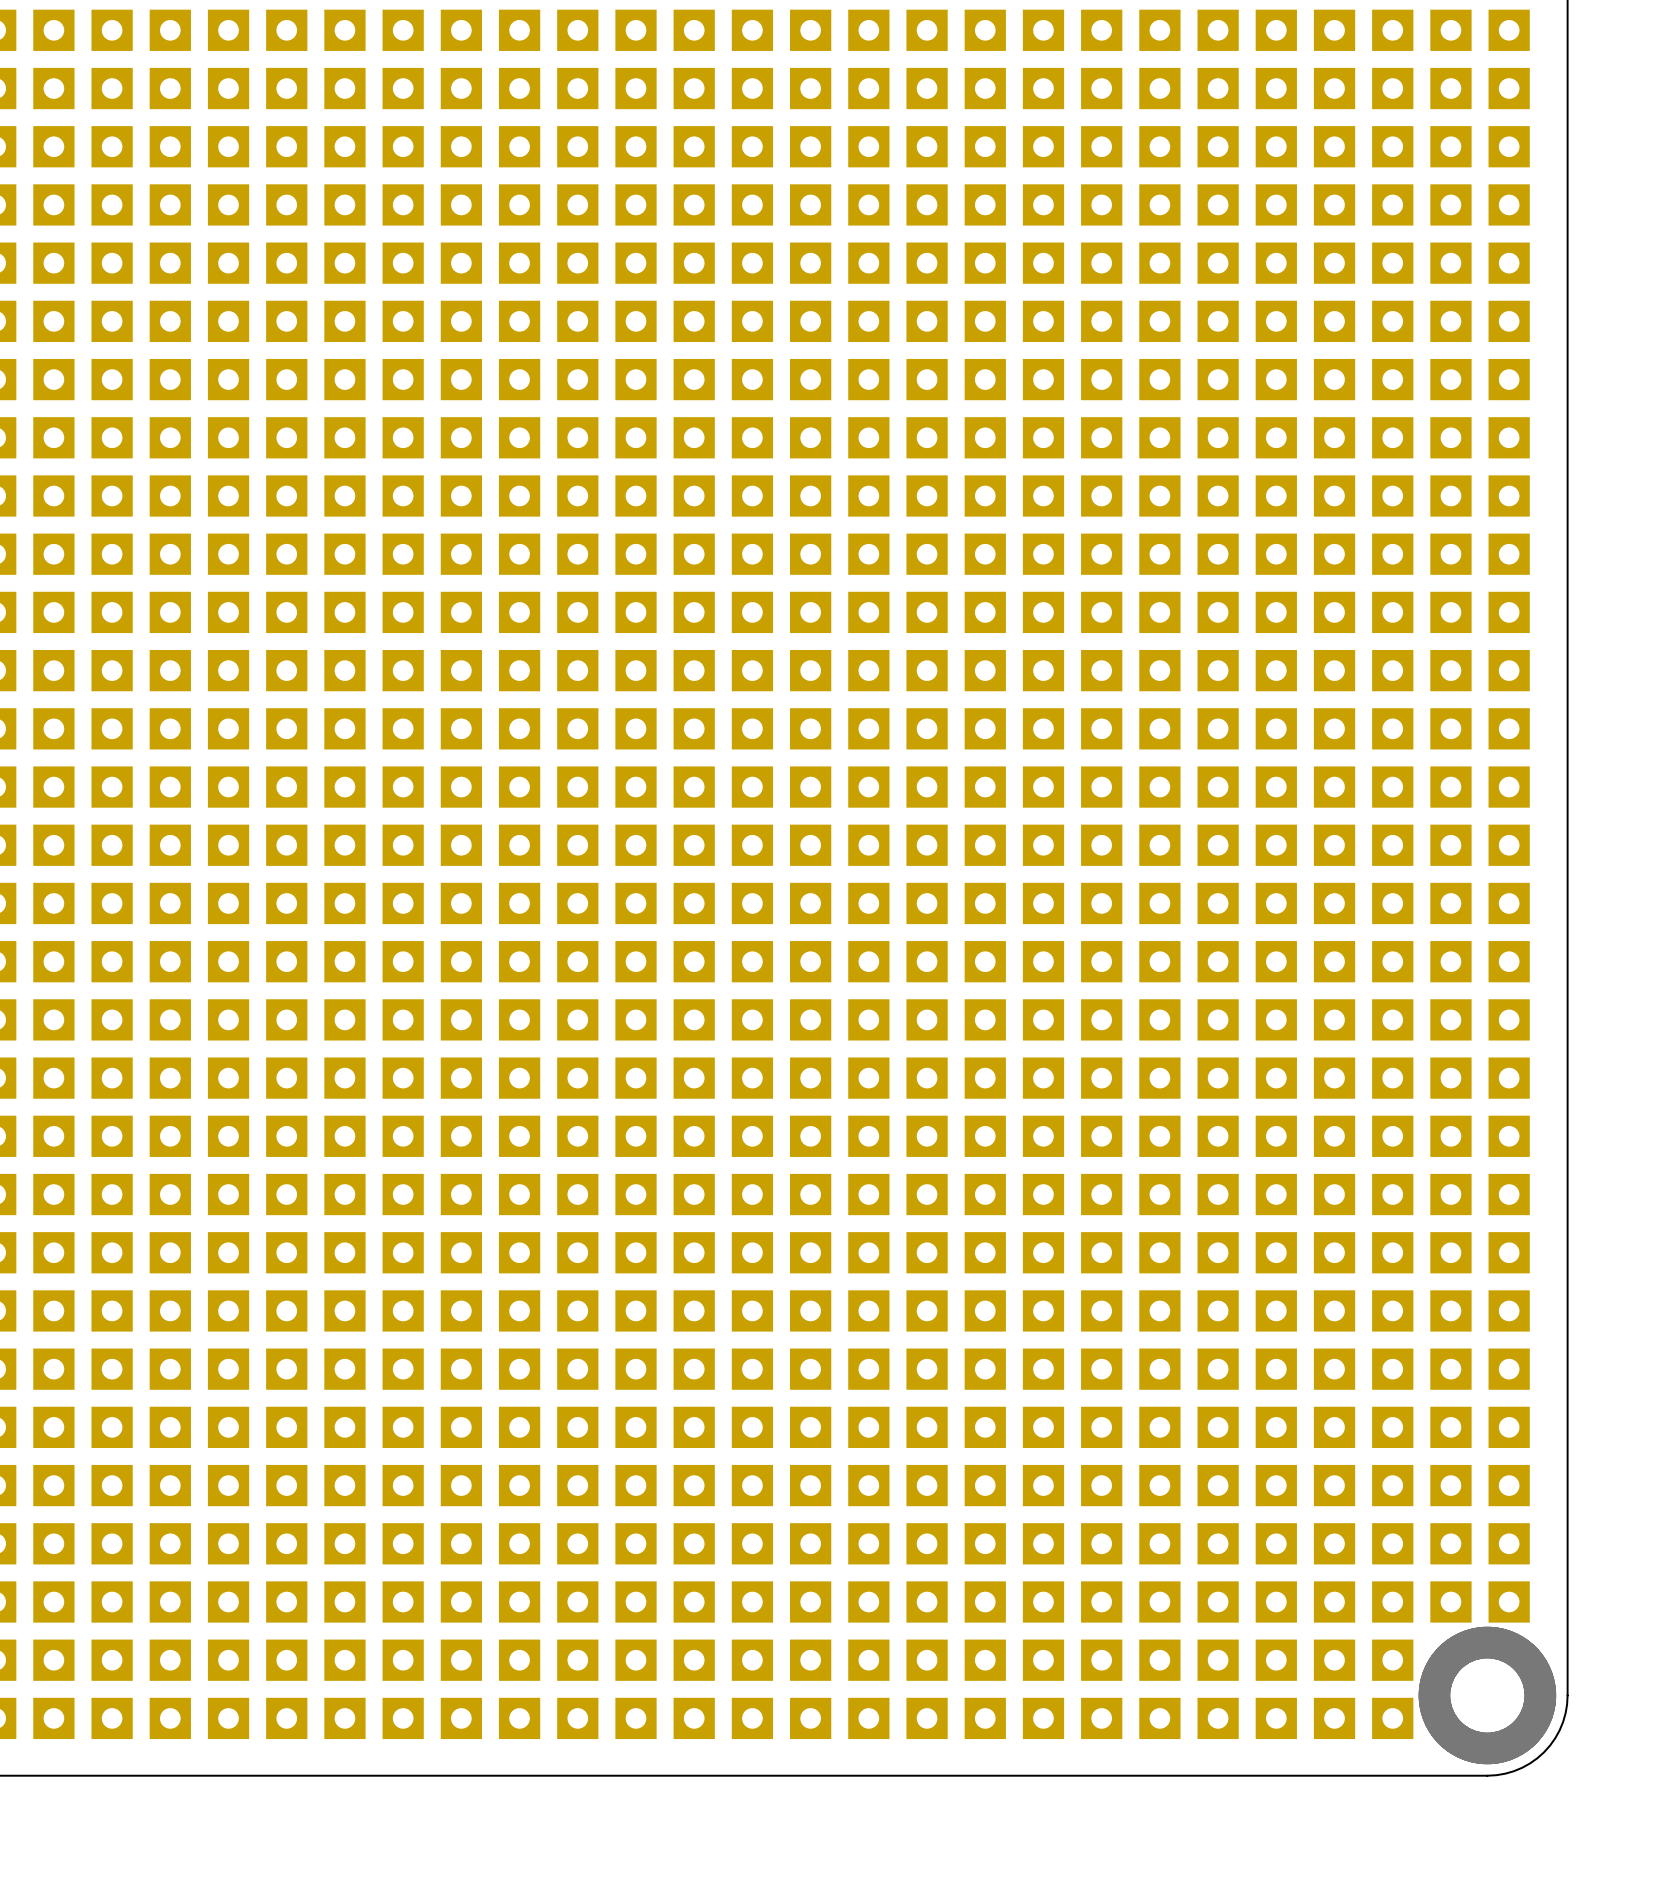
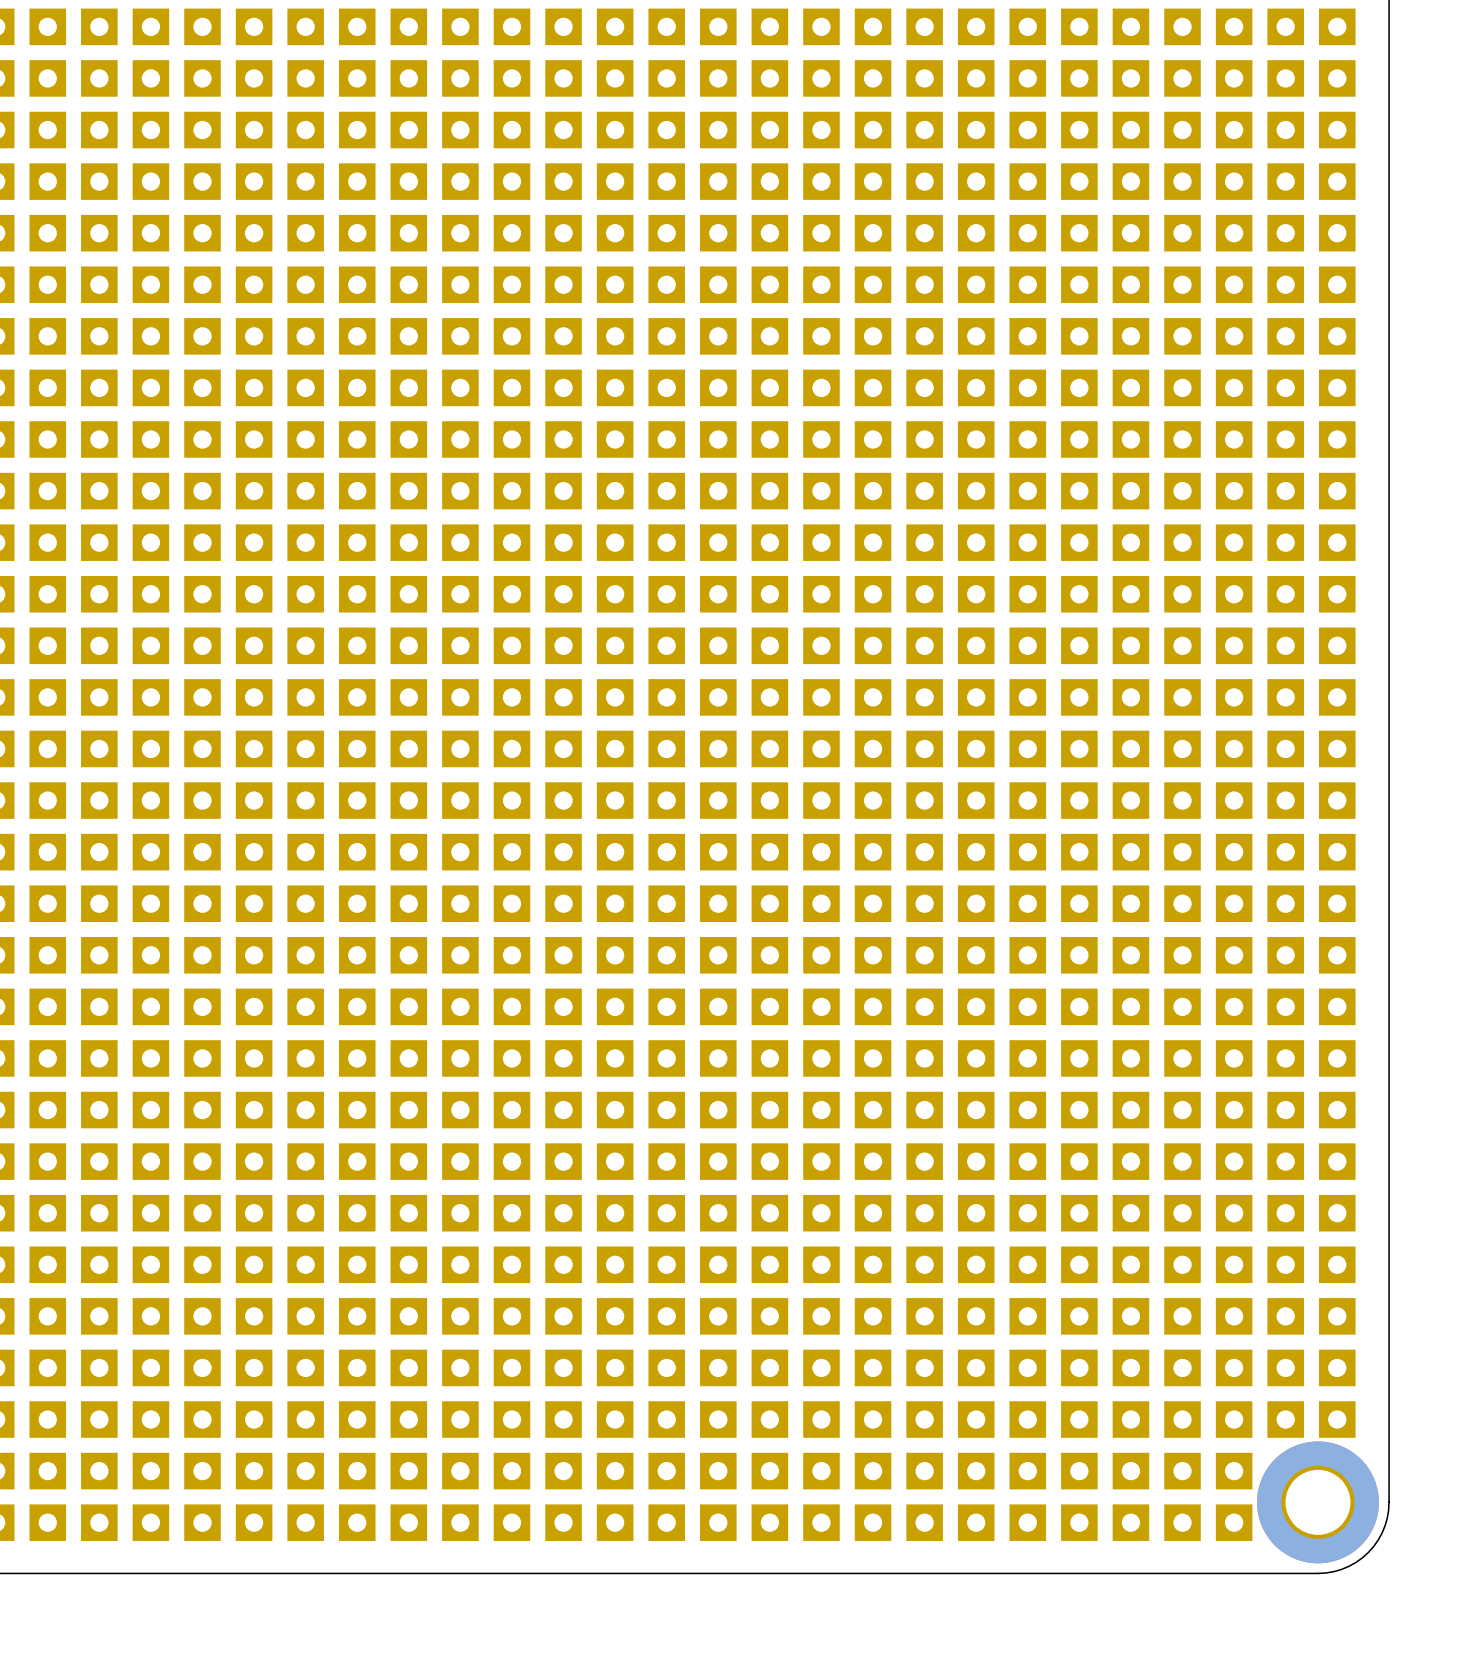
via: (1487, 1695) -> none
part: none -> (1317, 1502)

